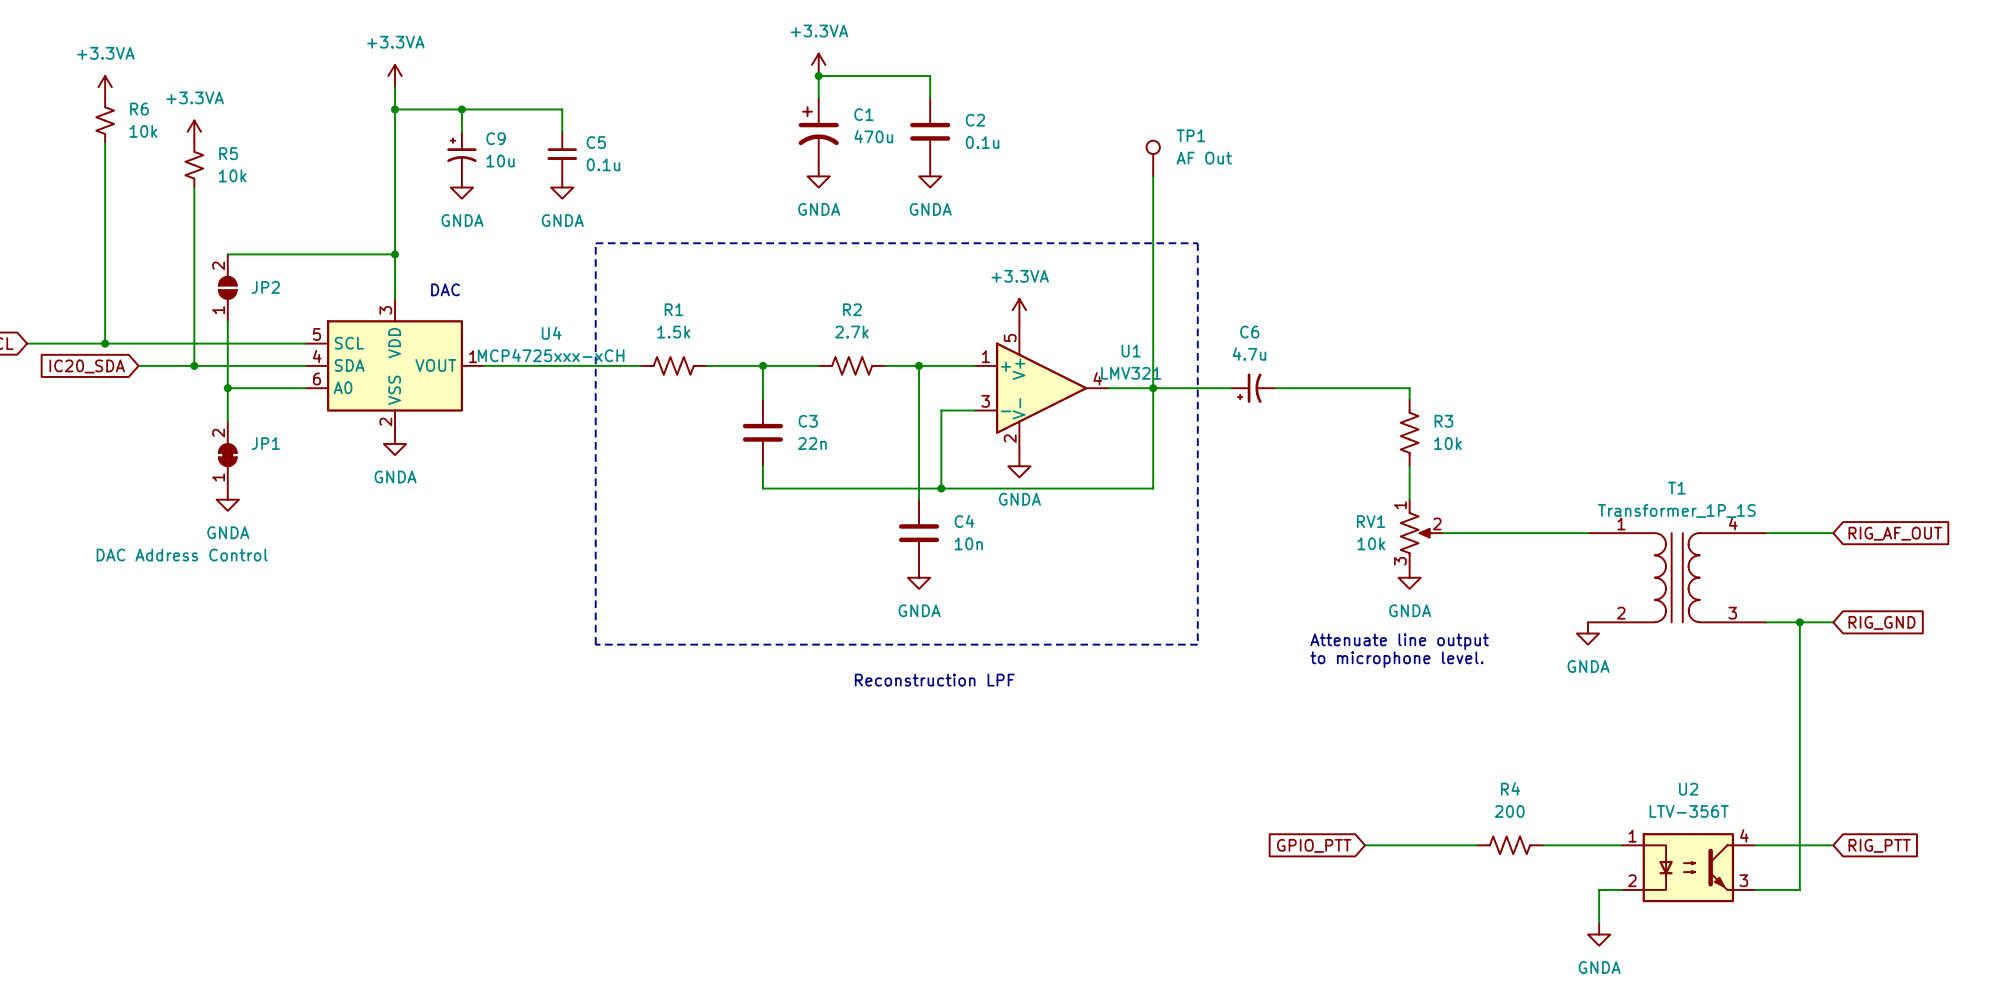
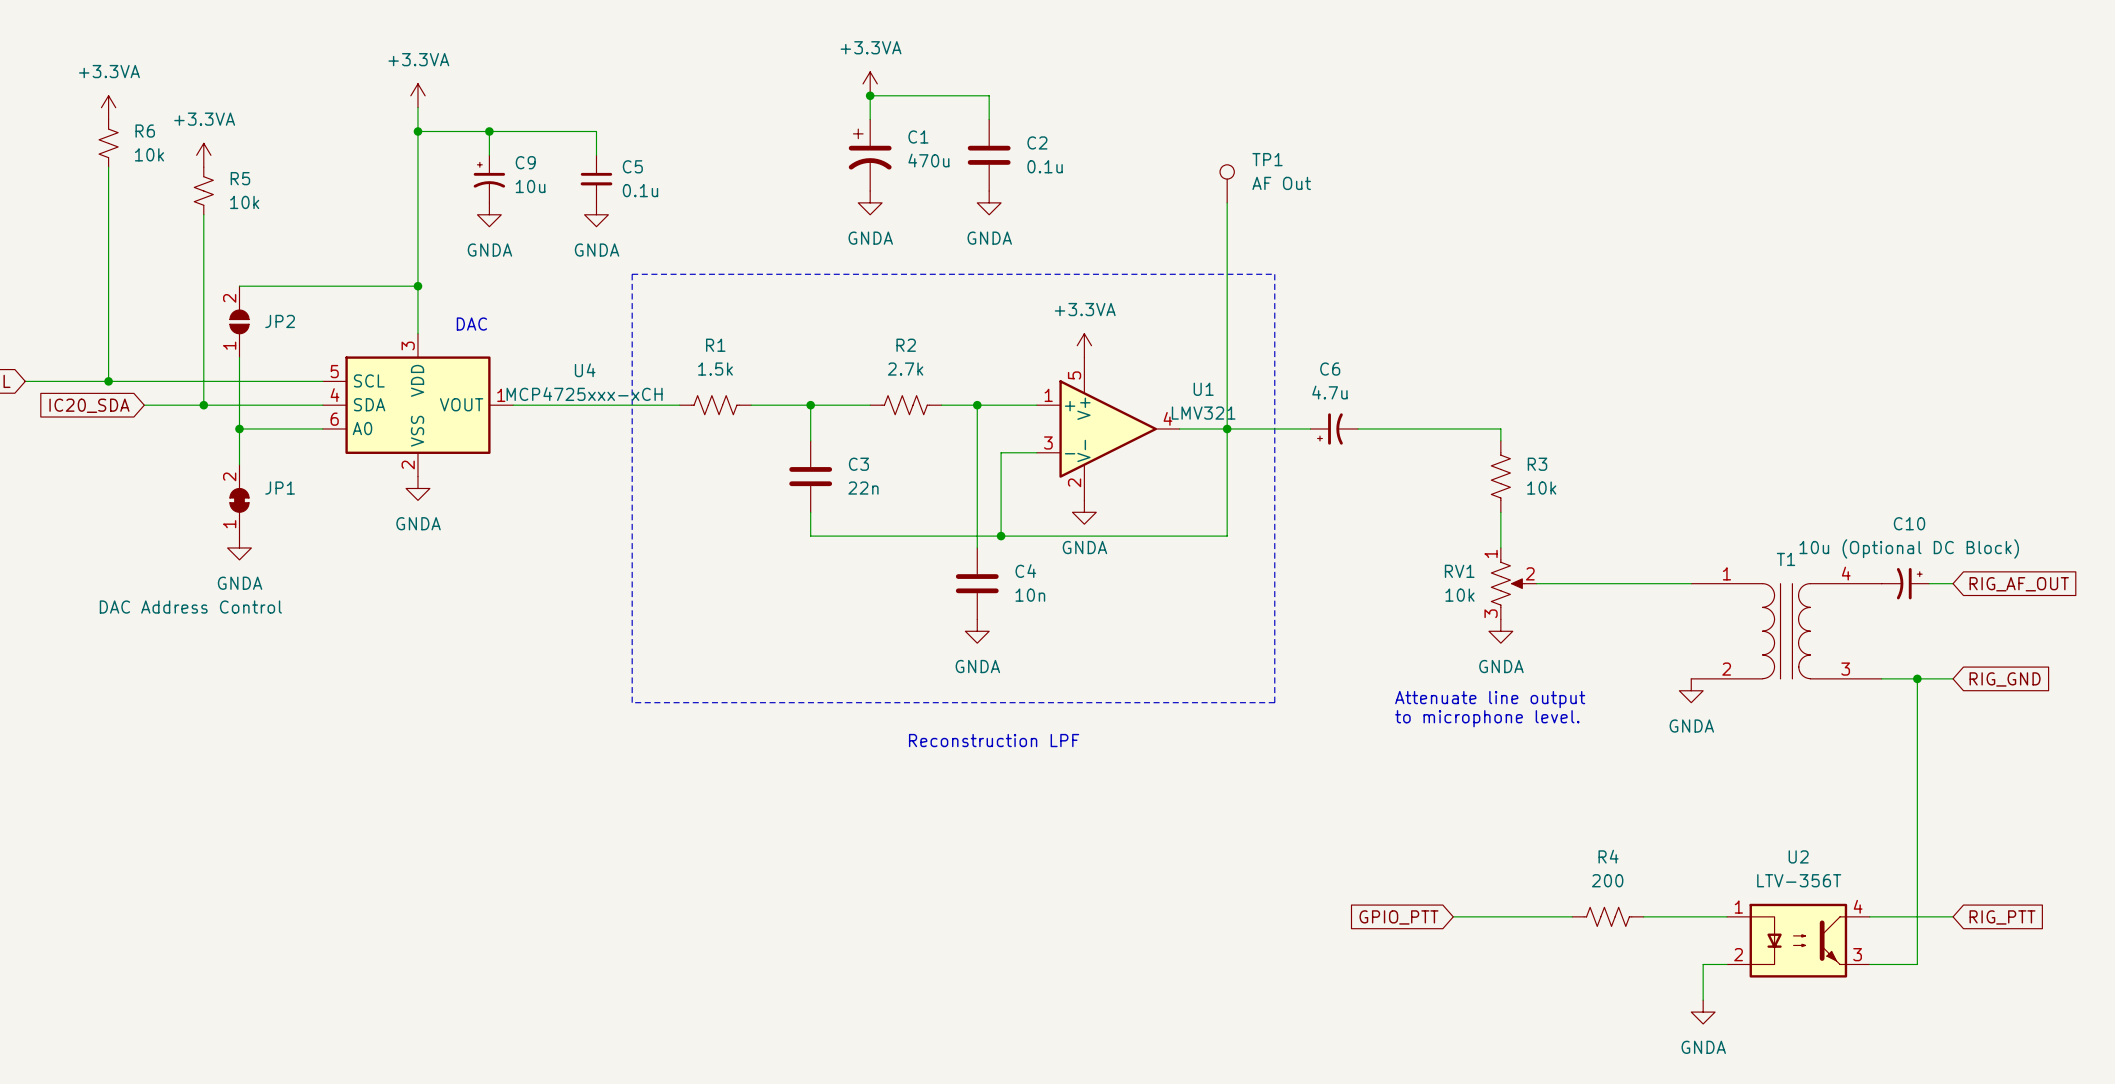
T1 name position: T1 (1676, 488) -> T1 (1786, 559)
T1 value: Transformer_1P_1S (1676, 510) -> none
C10: none -> 10u (Optional DC Block) (1905, 583)

